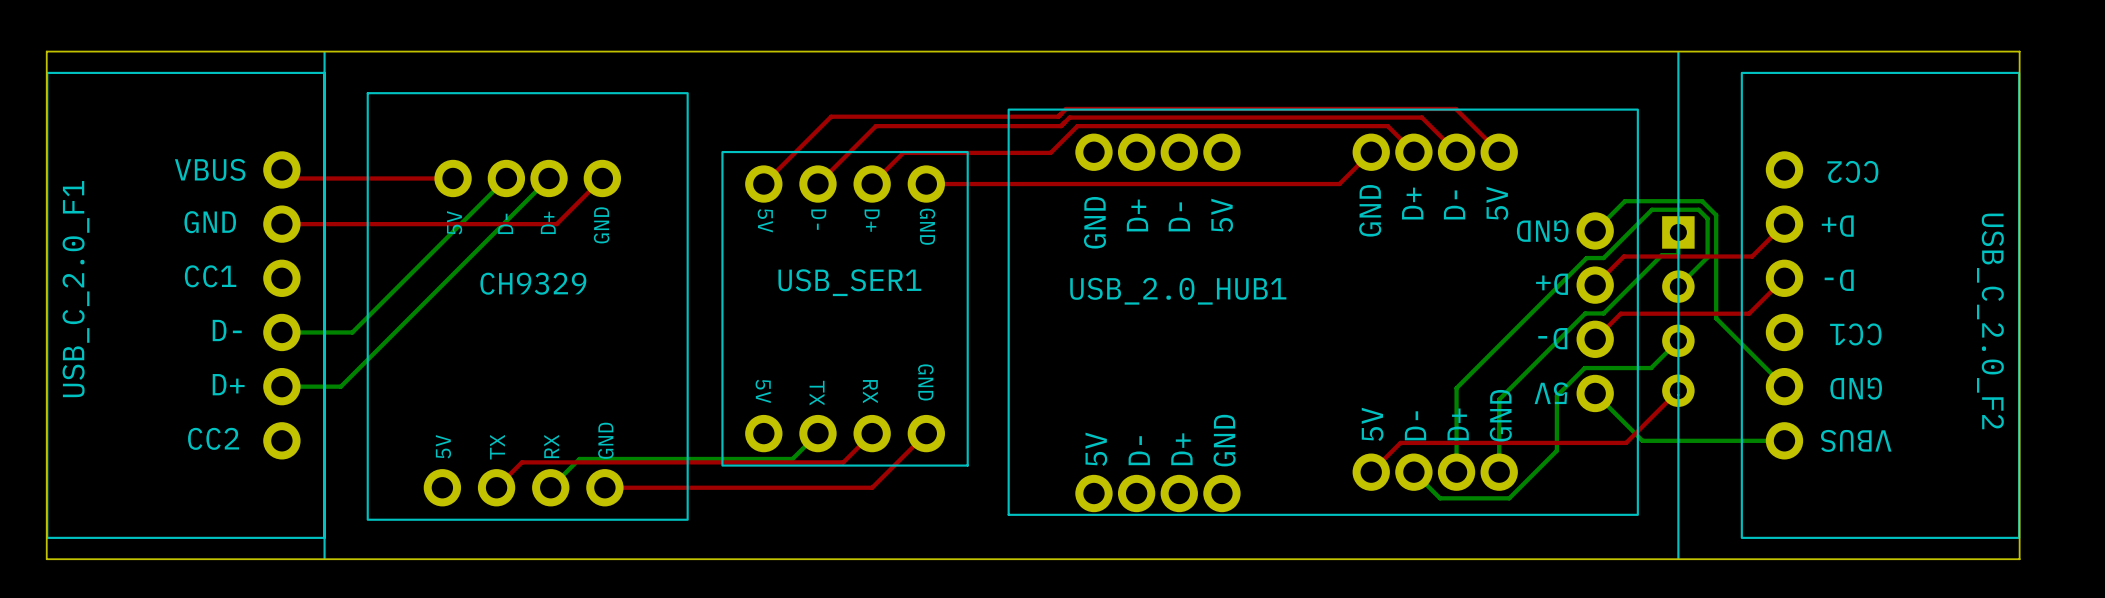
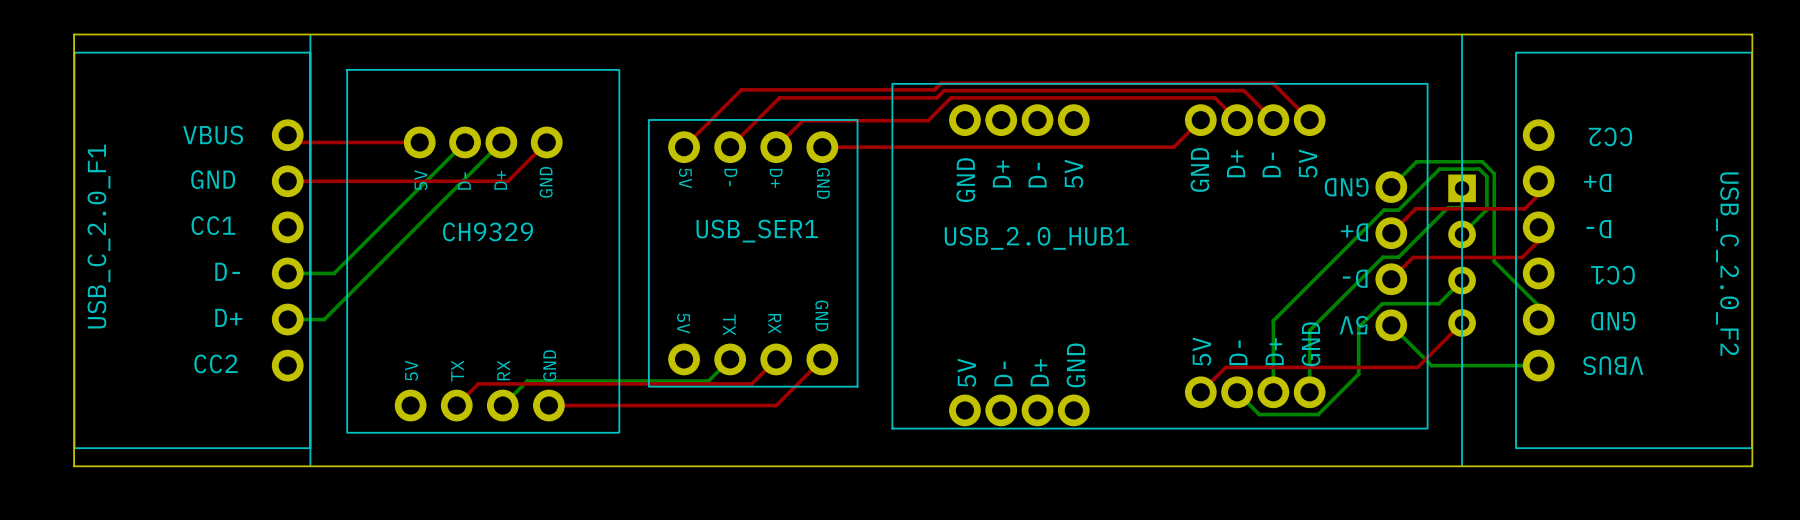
USB_C_2.0_F1 footprint: [46, 71, 326, 539] -> [73, 51, 312, 450]
USB_C_2.0_F2 footprint: [1740, 71, 2021, 539] -> [1515, 51, 1753, 450]

